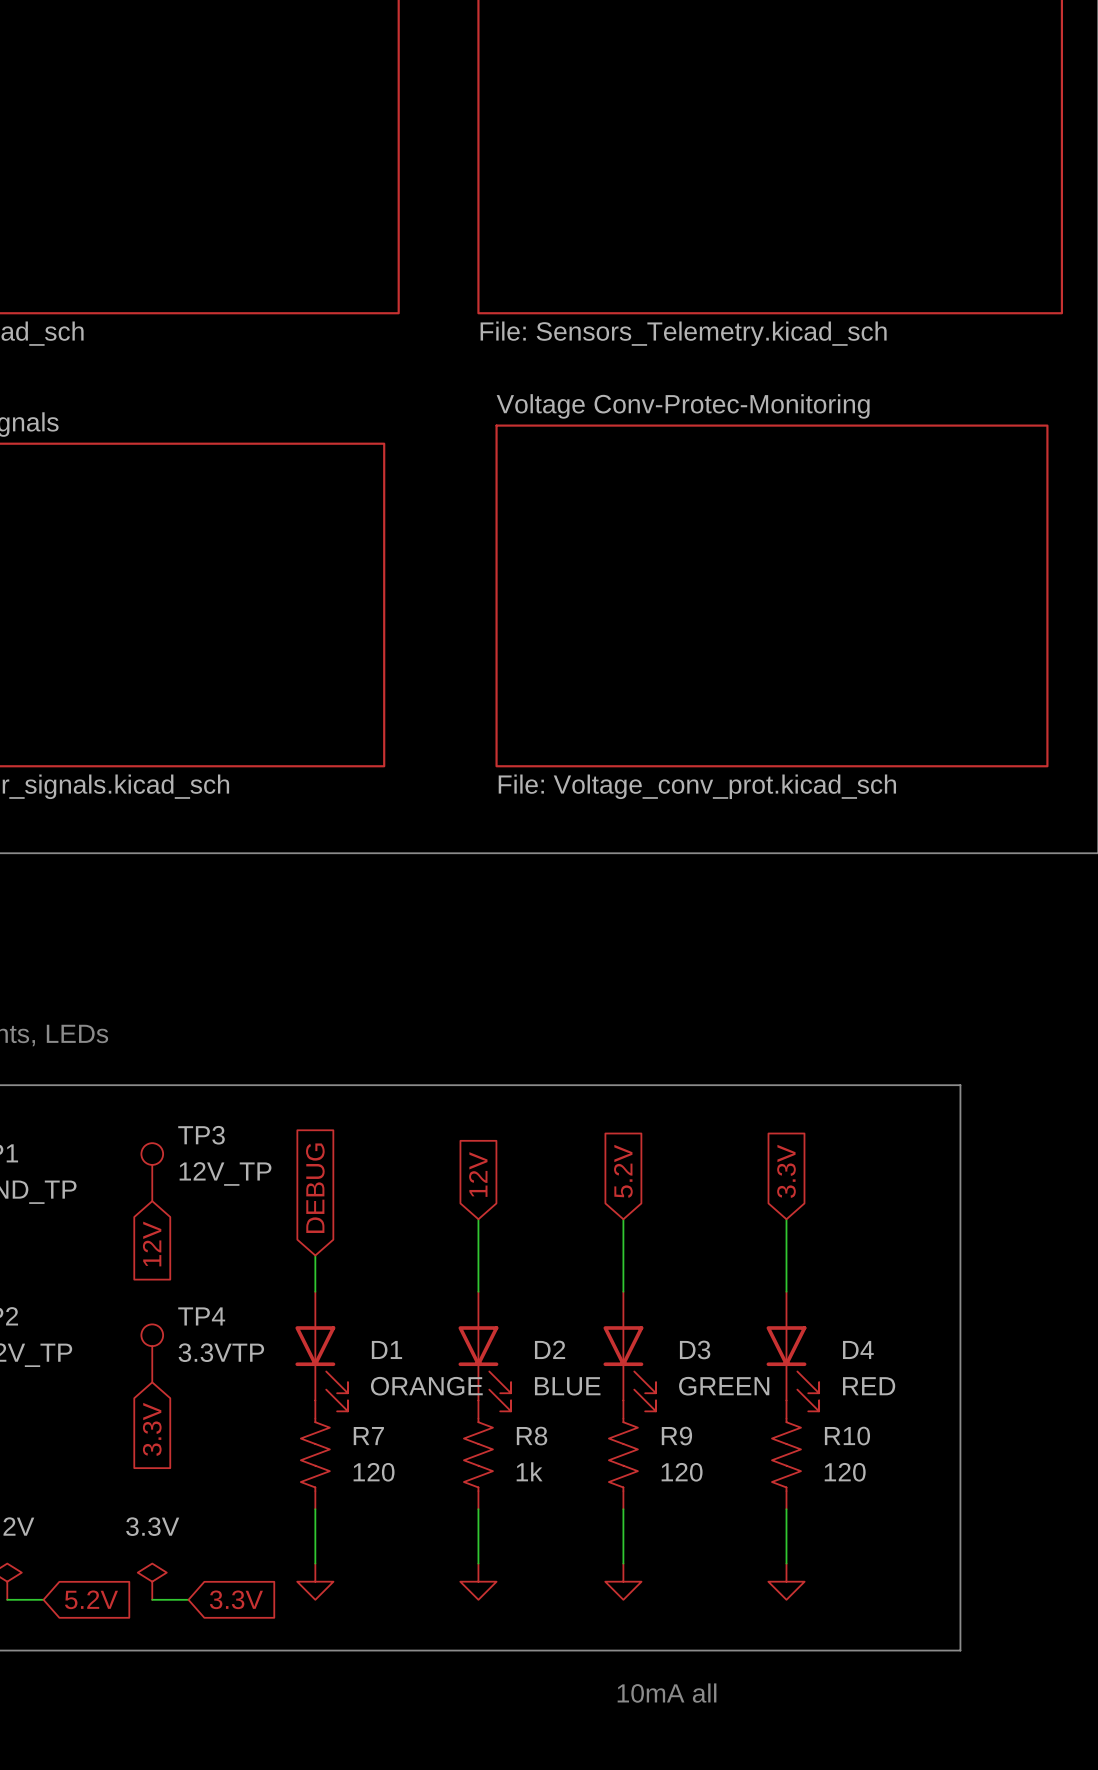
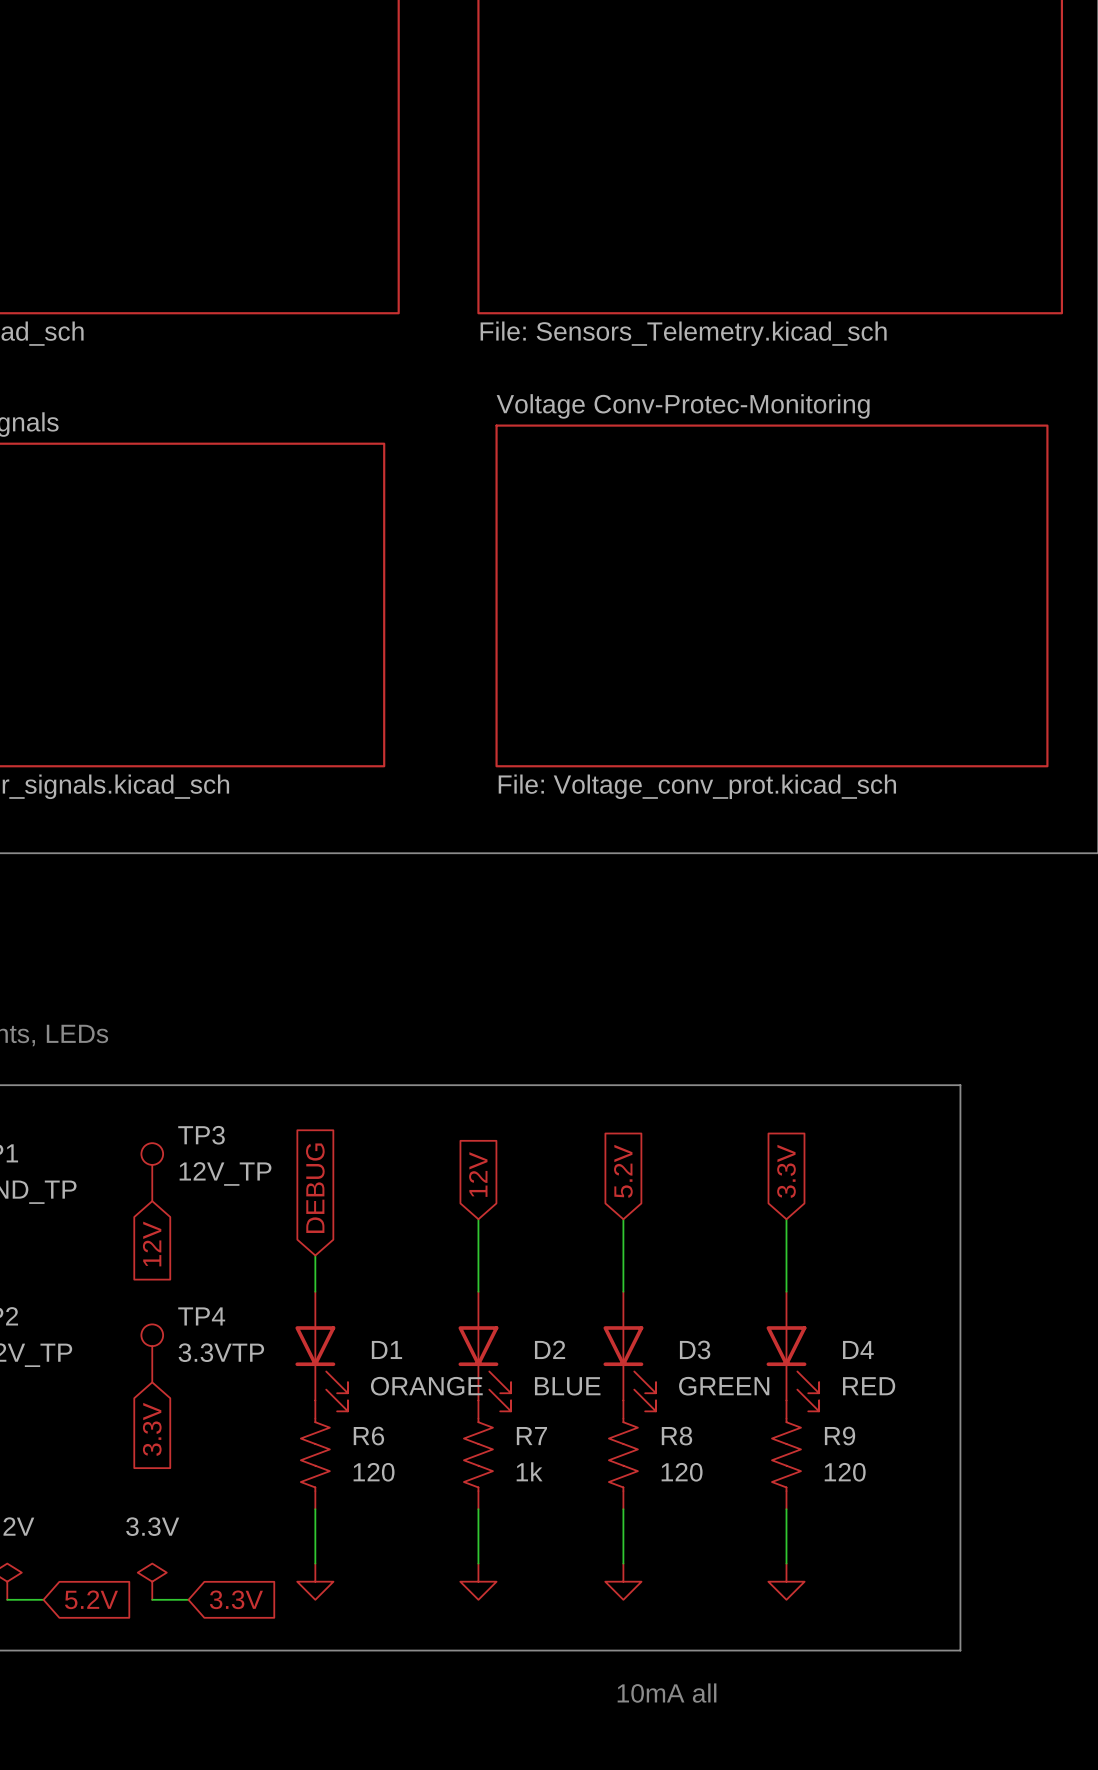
R7 name: R7 (368, 1436) -> R6 (368, 1436)
R8 name: R8 (532, 1436) -> R7 (531, 1436)
R9 name: R9 (676, 1436) -> R8 (676, 1436)
R10 name: R10 (847, 1436) -> R9 (840, 1436)

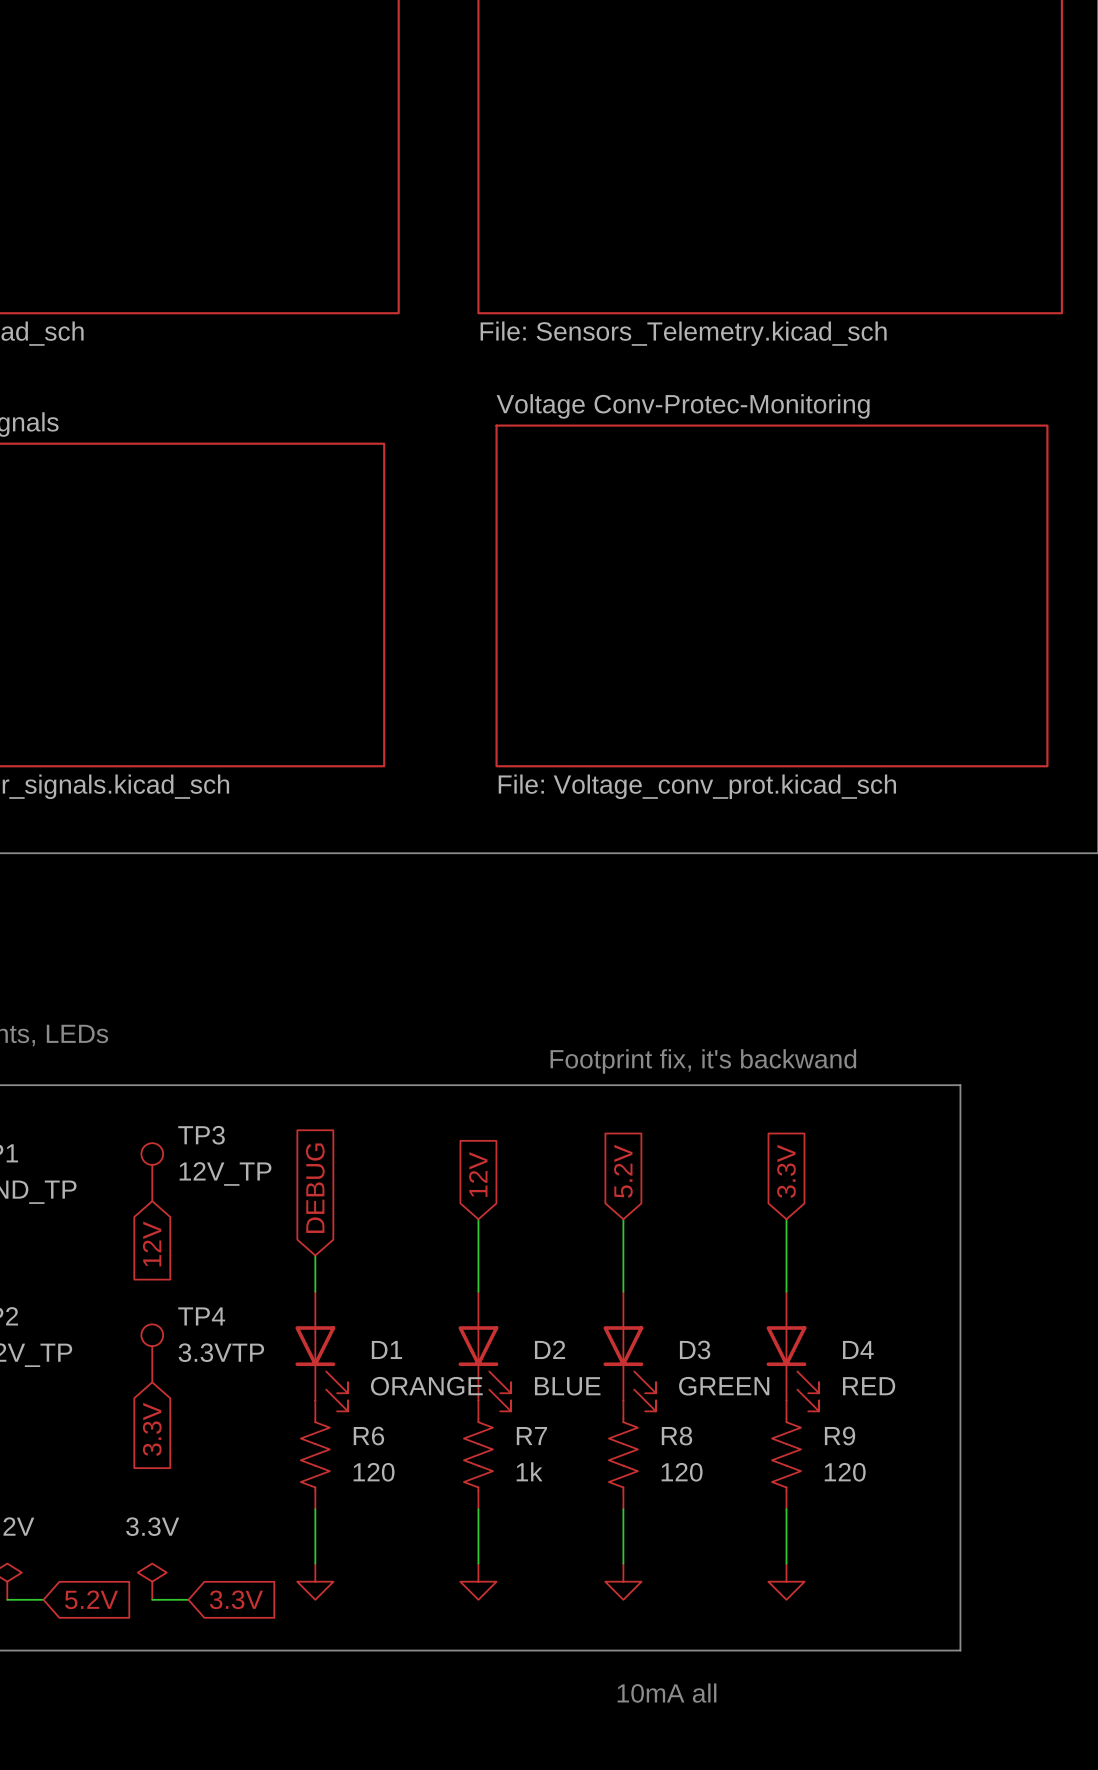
text: none -> Footprint fix, it's backwand (703, 1061)

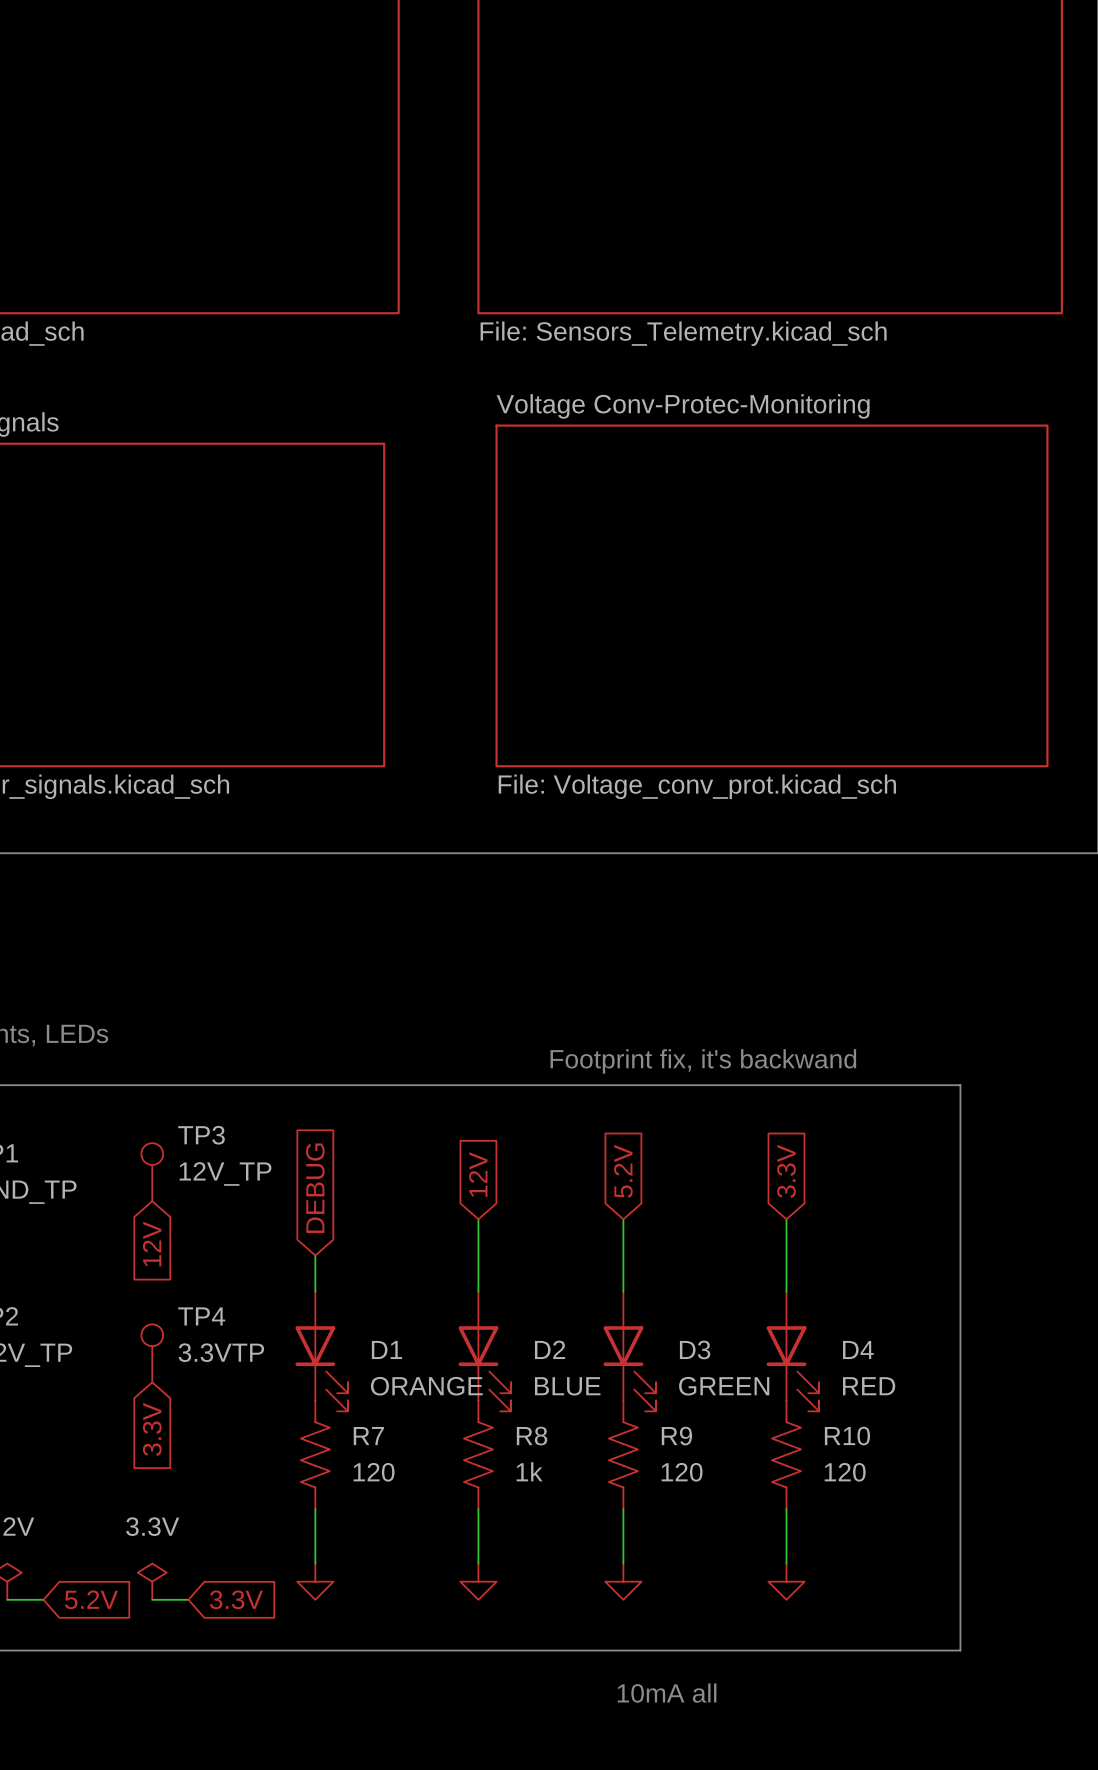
R6 name: R6 (368, 1436) -> R7 (368, 1436)
R7 name: R7 (531, 1436) -> R8 (532, 1436)
R8 name: R8 (676, 1436) -> R9 (676, 1436)
R9 name: R9 (840, 1436) -> R10 (847, 1436)

